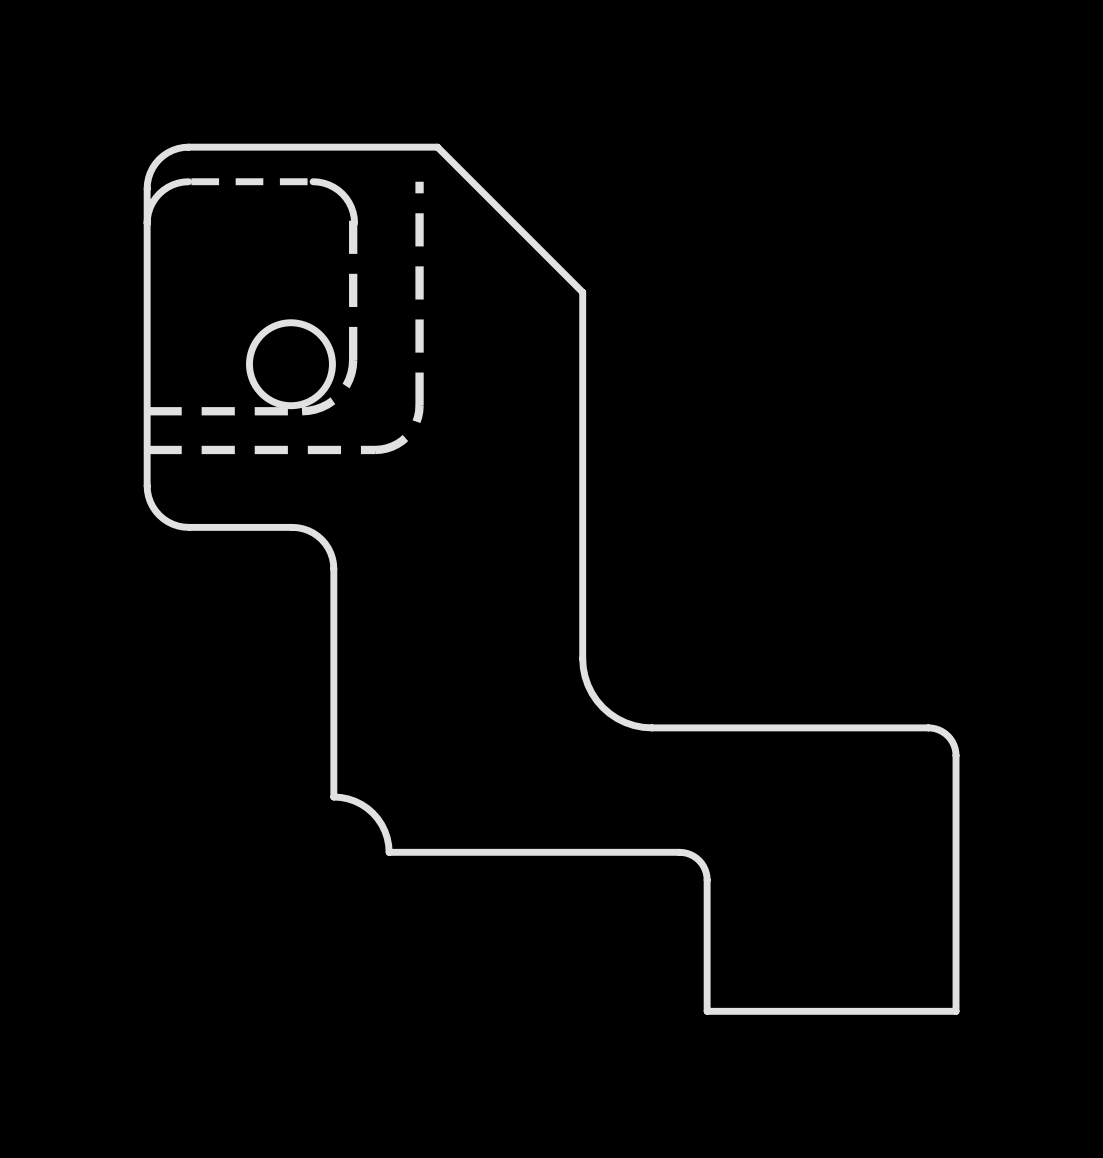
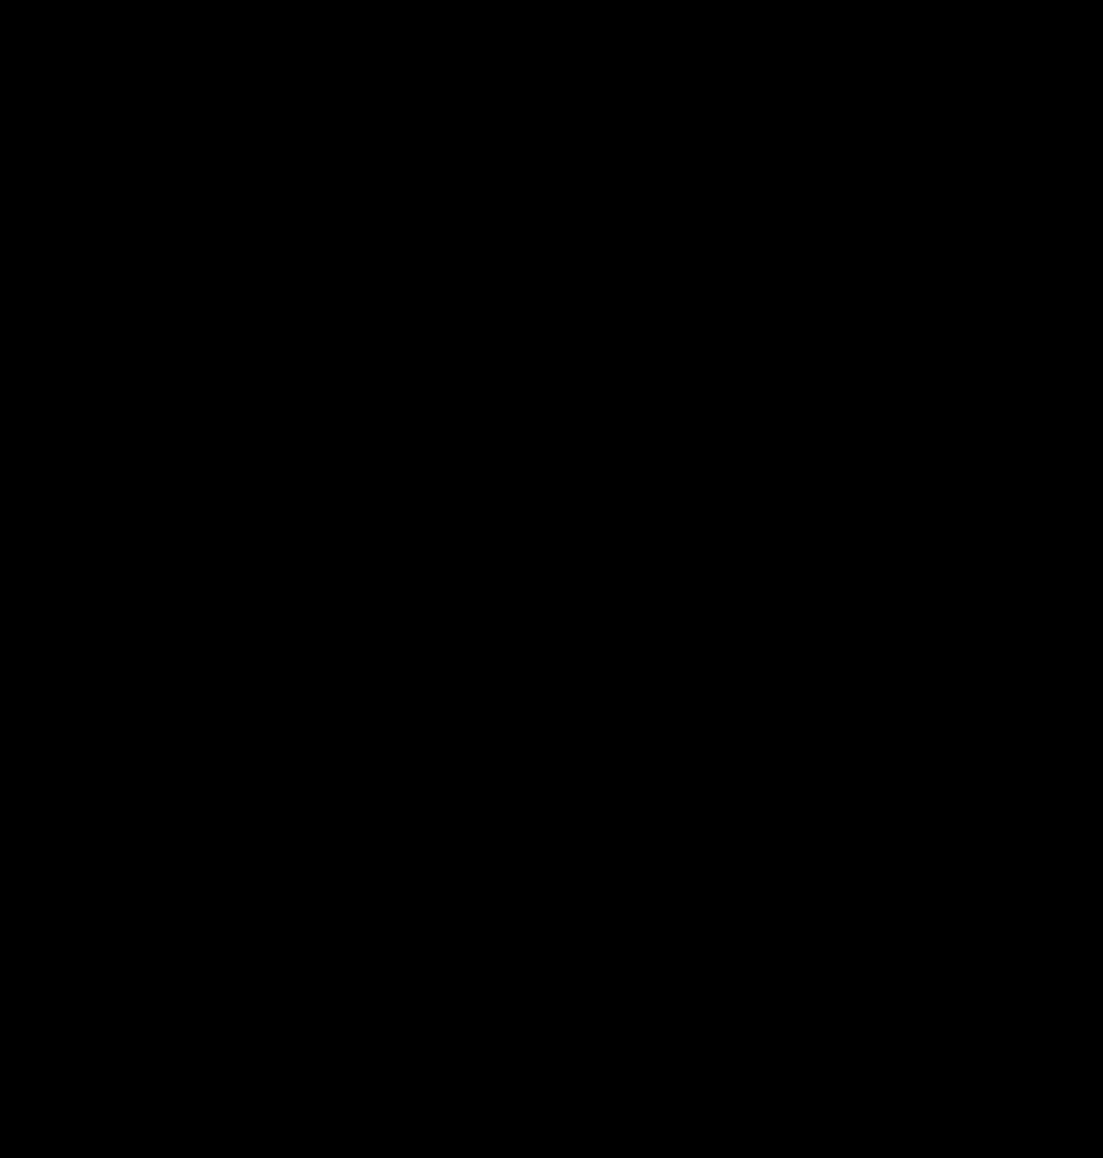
line: (188, 181) (172, 184) (159, 193) (150, 207) (147, 223) -> none
line: (191, 181) (311, 181) -> none
line: (313, 181) (328, 184) (342, 193) (351, 207) (354, 223) -> none
line: (419, 181) (419, 405) (416, 422) (406, 437) (392, 446) (375, 449) (148, 449) -> none
line: (353, 217) (352, 366) (346, 385) (338, 396) (327, 404) (308, 410) (148, 411) -> none
drawing: [246, 319, 336, 410] -> none
line: (188, 527) (172, 524) (163, 518) (152, 506) (147, 491) (147, 188) (152, 167) (167, 152) (183, 147) (437, 147) (582, 292) (582, 658) (585, 676) (591, 693) (602, 707) (617, 718) (642, 727) (928, 727) (945, 733) (953, 744) (956, 755) (956, 1011) (707, 1011) (706, 876) (701, 863) (686, 853) (389, 852) (384, 831) (372, 813) (354, 801) (333, 797) (333, 568) (328, 548) (313, 532) (297, 527) (190, 527) -> none

